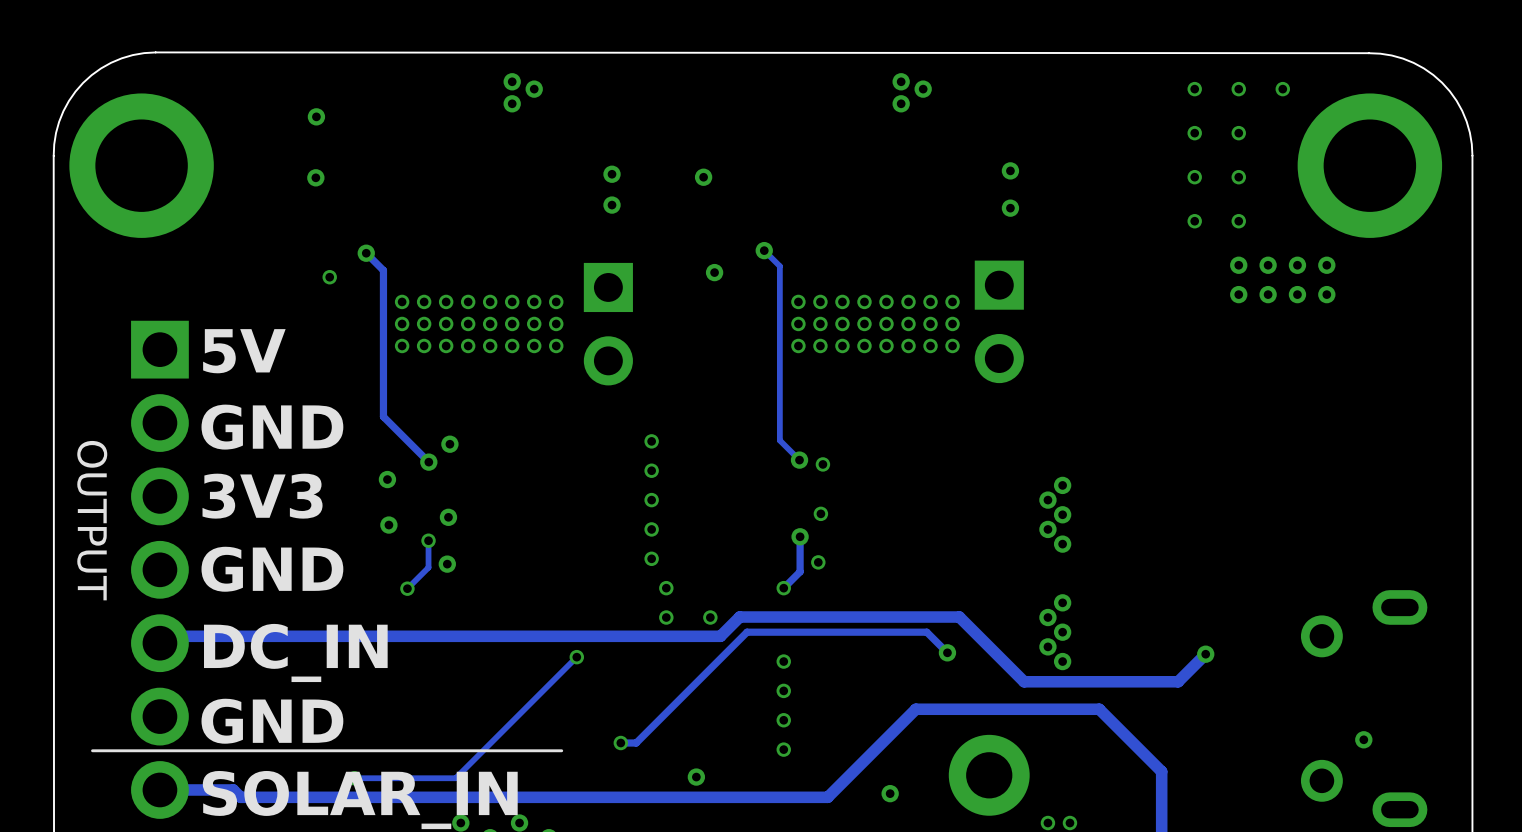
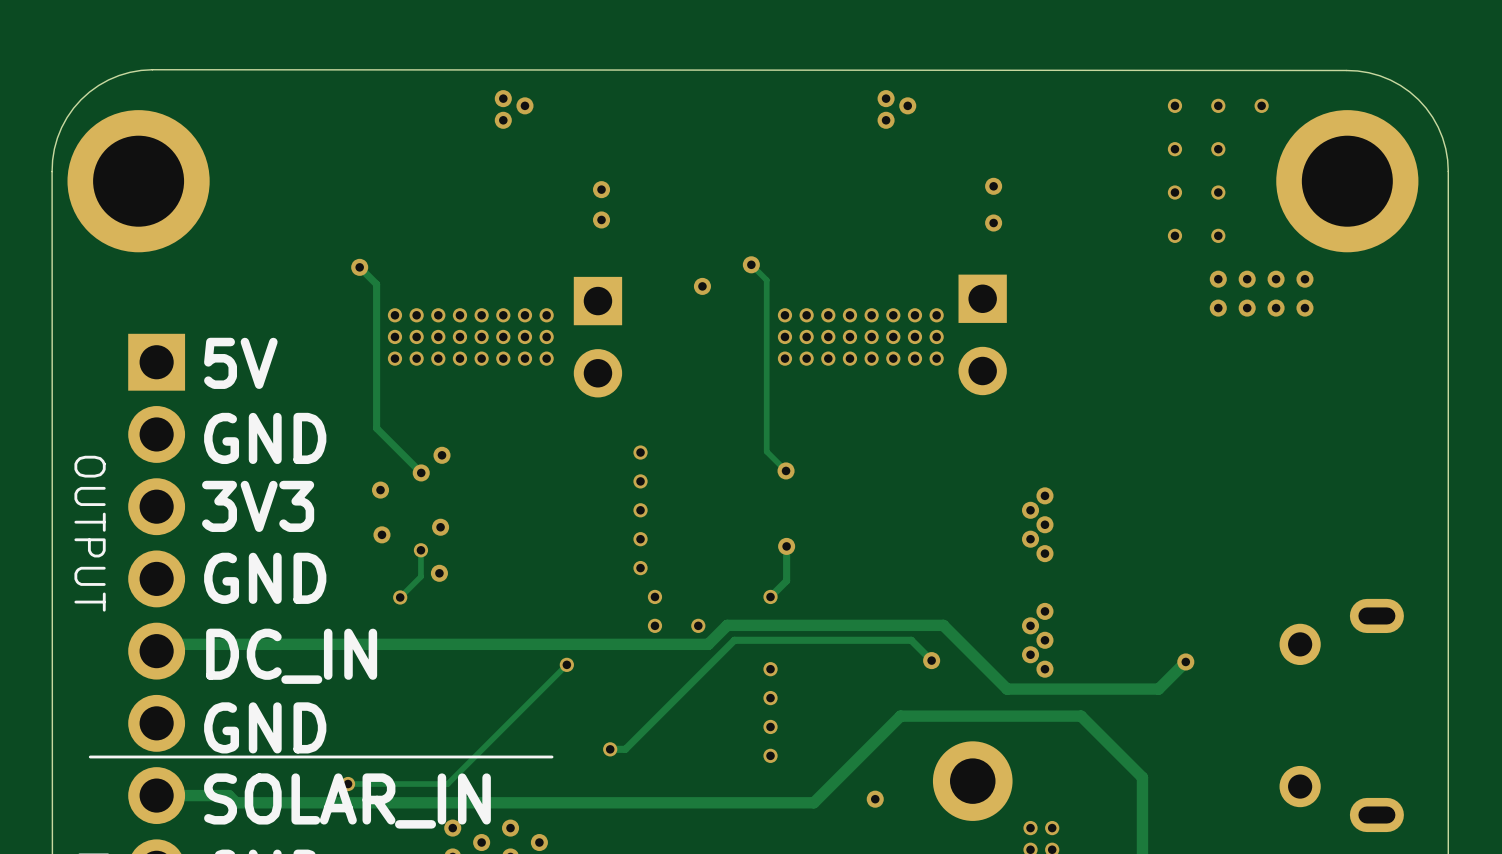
via: (316, 116) -> none
via: (315, 177) -> none
via: (703, 177) -> none
via: (329, 277) -> none
via: (822, 464) -> none
via: (820, 513) -> none
via: (818, 562) -> none
via: (1363, 739) -> none
via: (696, 777) -> none

